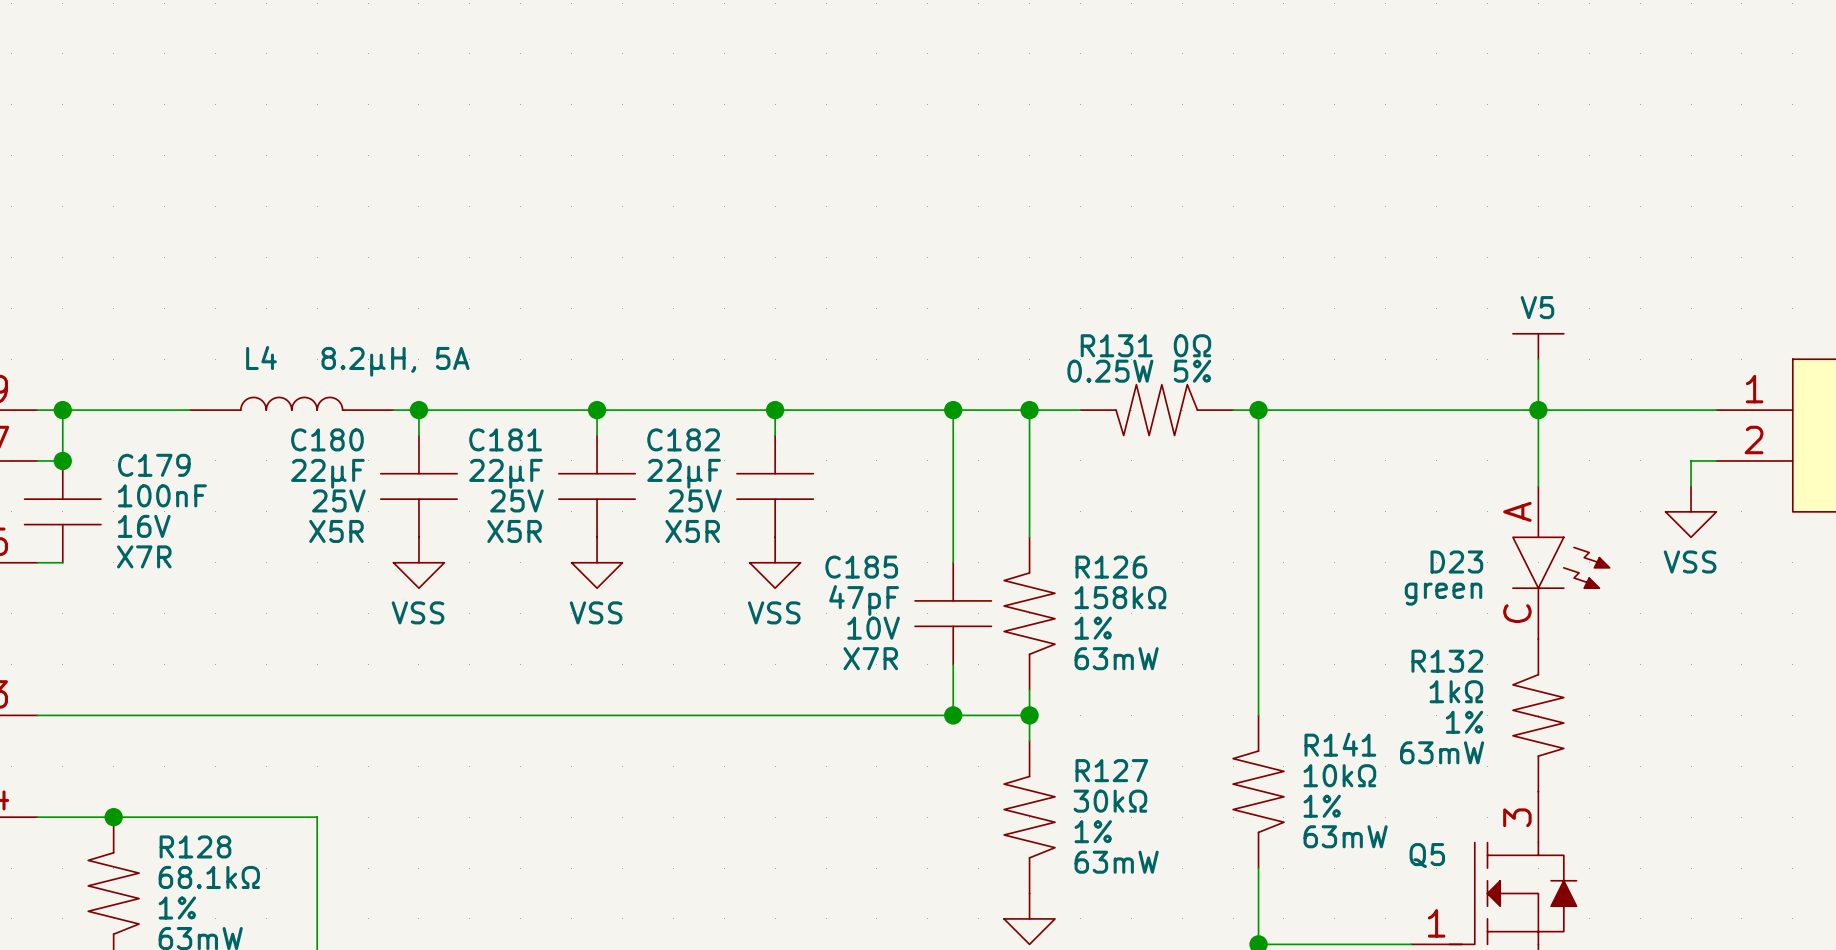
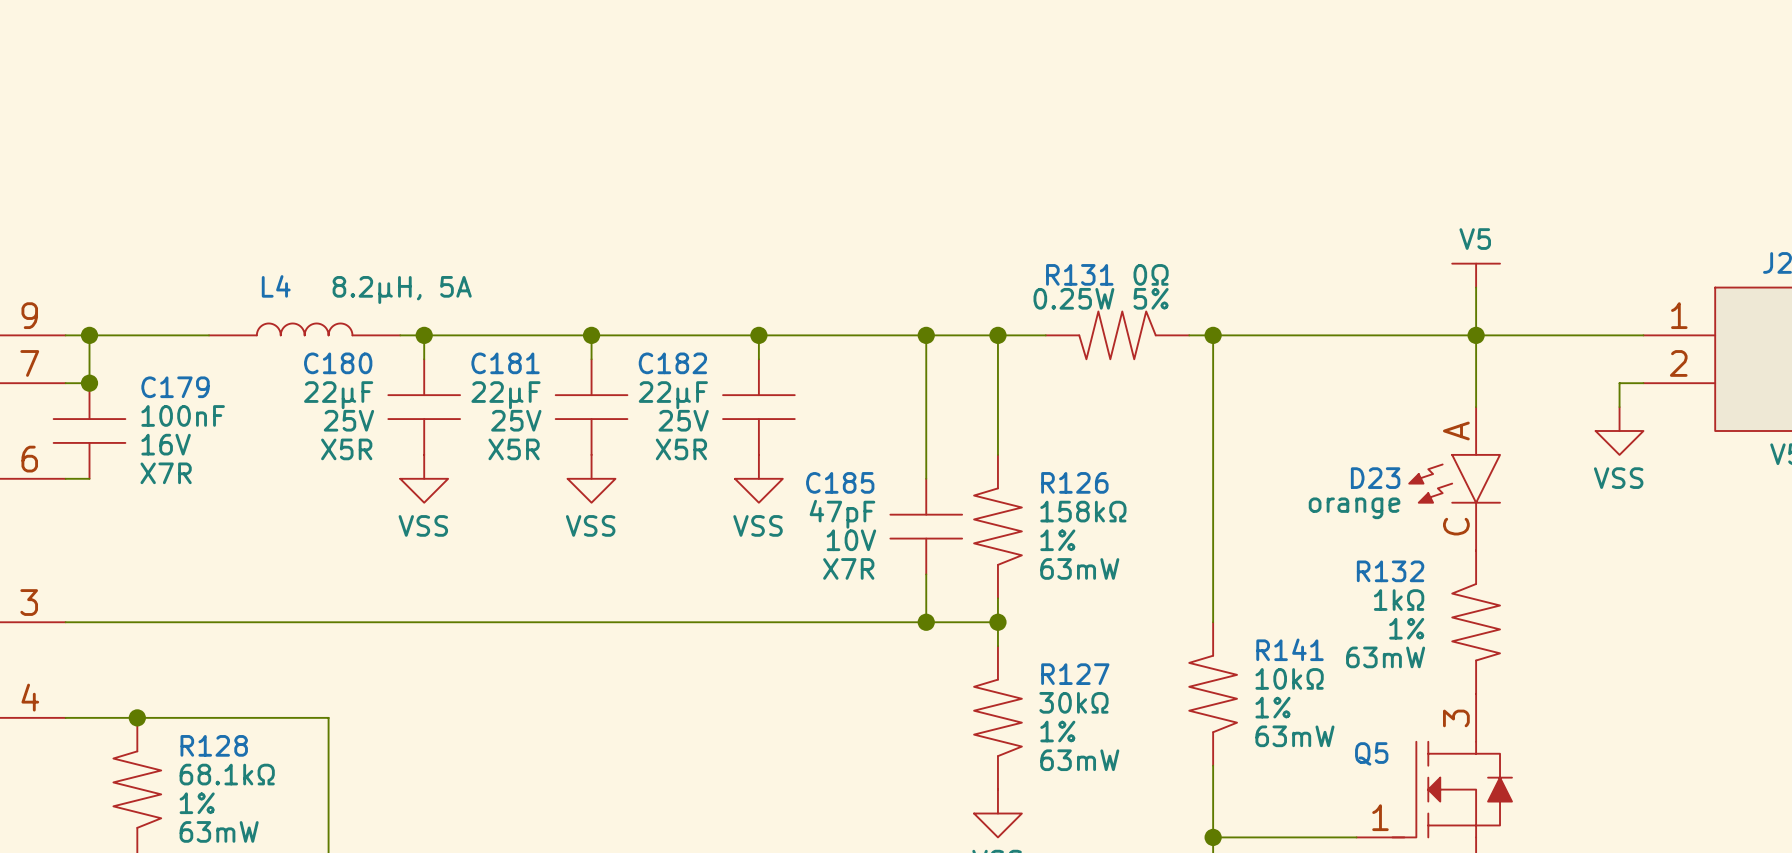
D23 flip: as is (1561, 562) -> left-right (1454, 478)
D23 value: green (1443, 594) -> orange (1354, 508)

